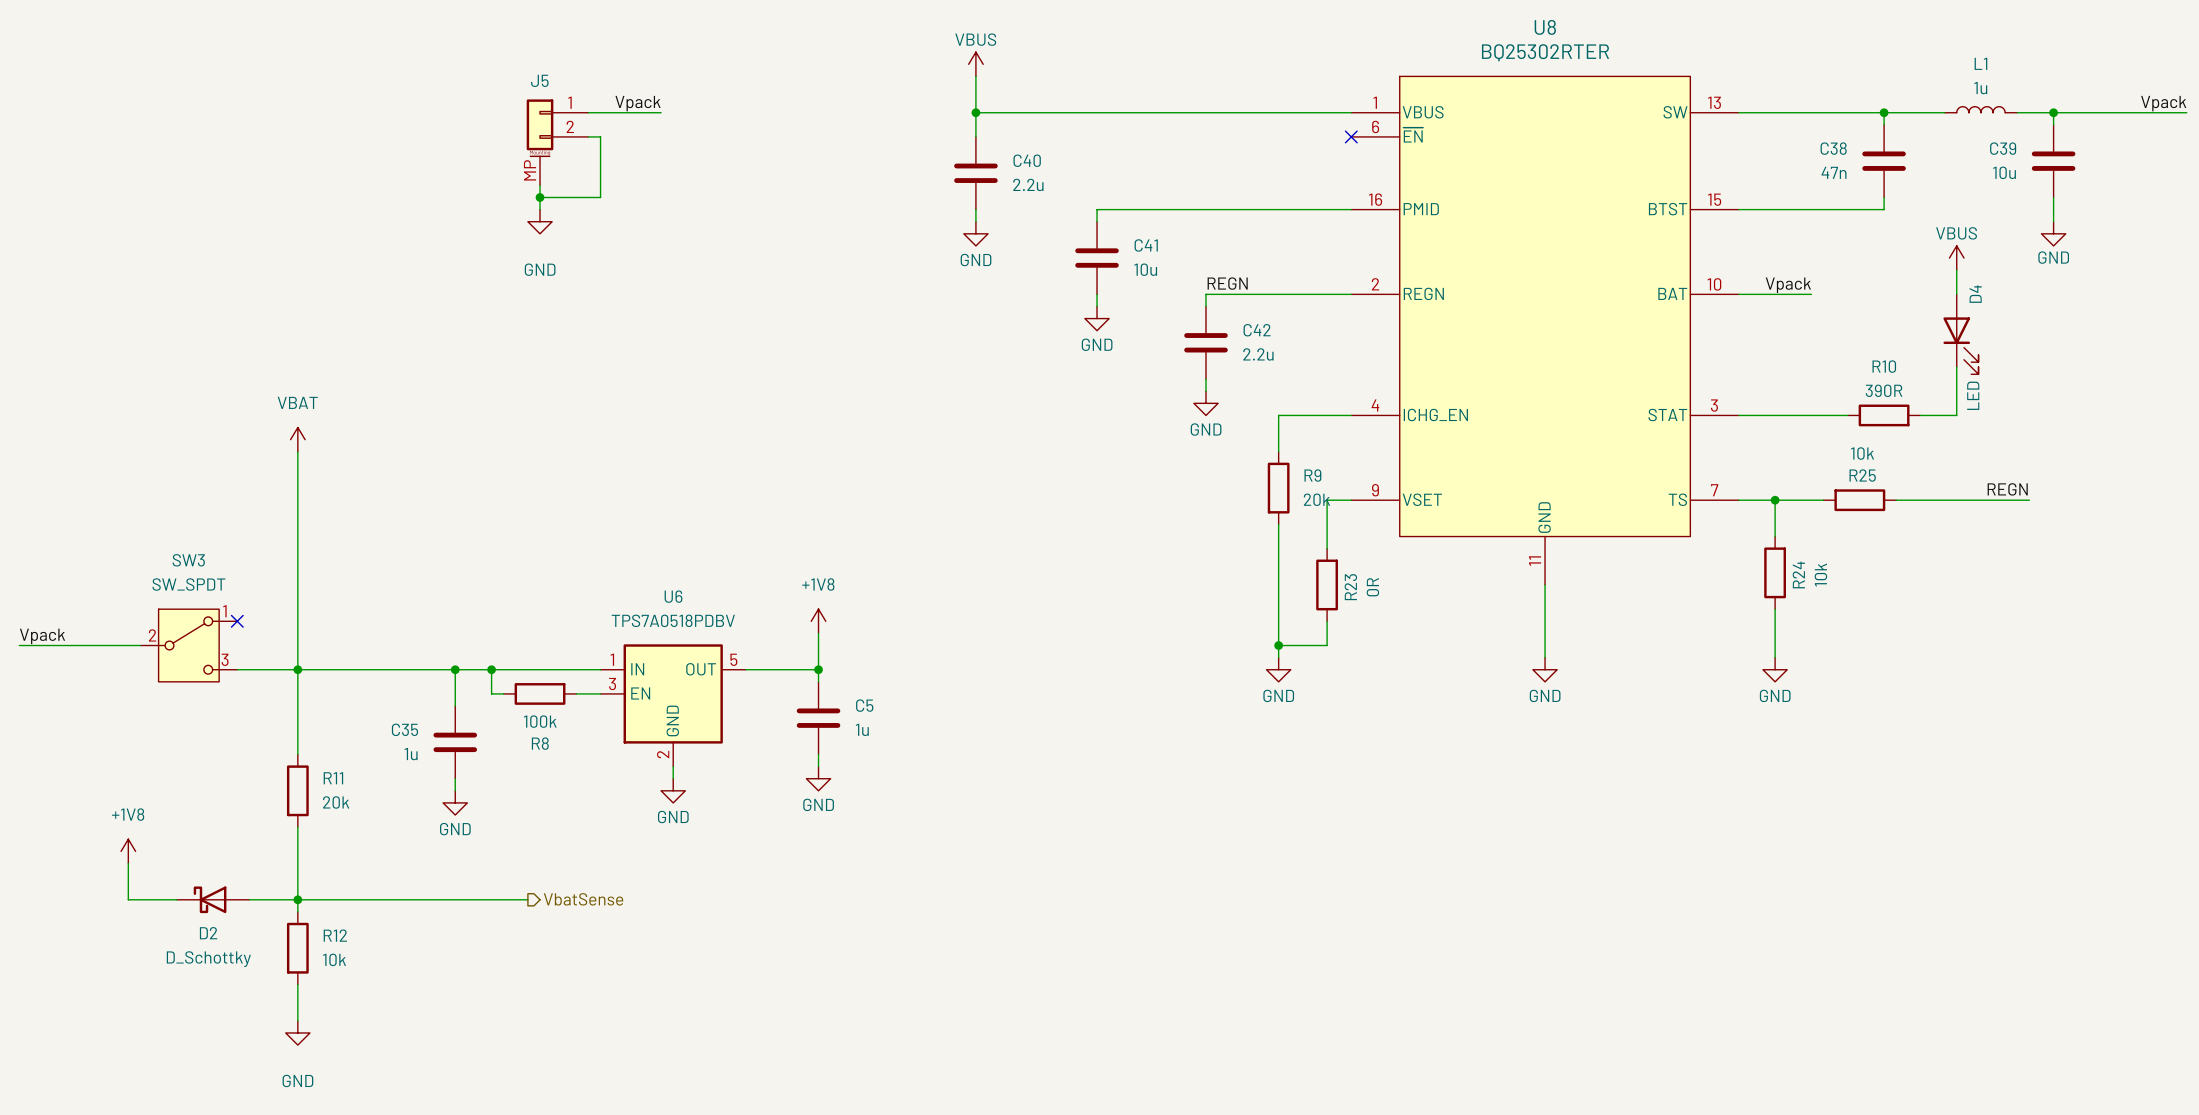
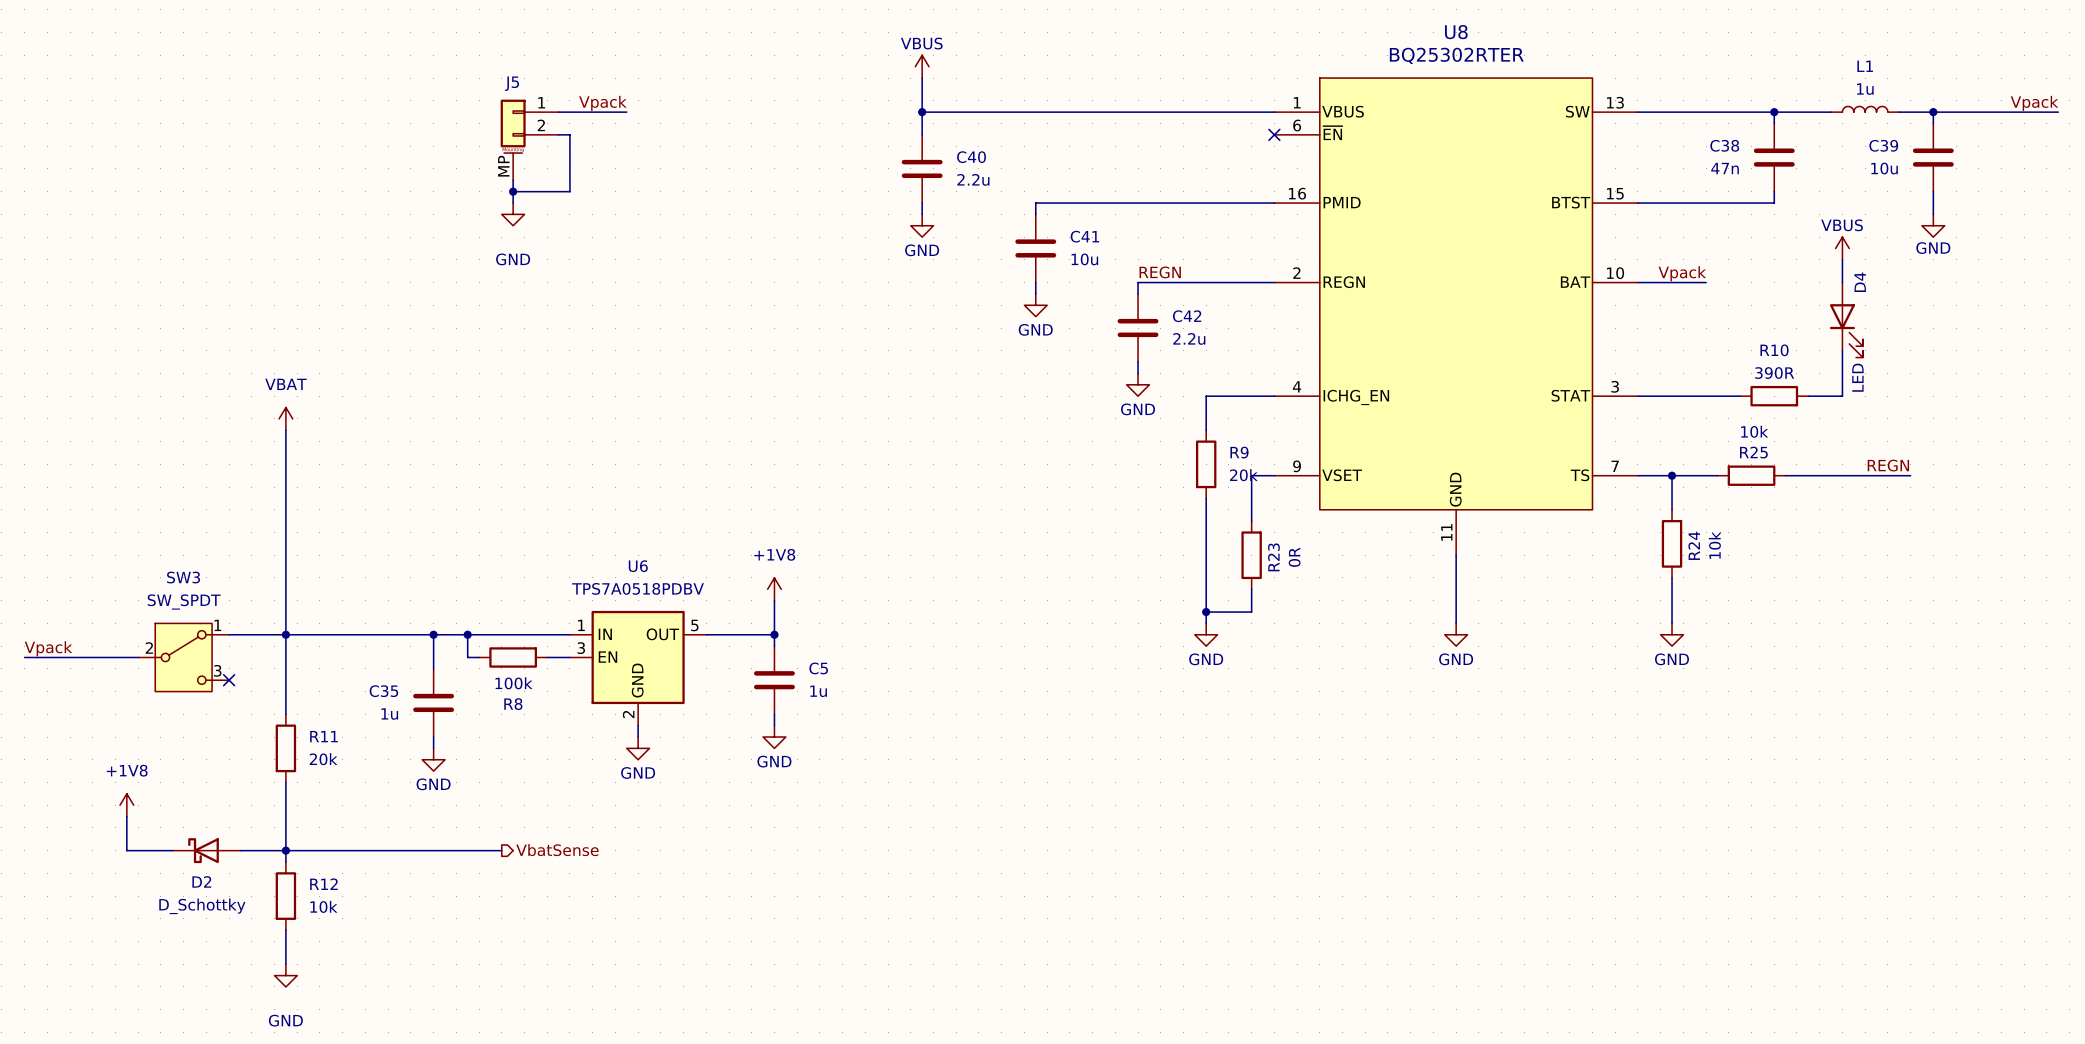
no-connect mark: (237, 621) -> none
label position: Vpack (42, 636) -> Vpack (48, 648)
wire: (19, 645) (140, 645) -> (24, 657) (138, 657)
SW3 position: (188, 645) -> (183, 657)
no-connect mark: none -> (229, 680)

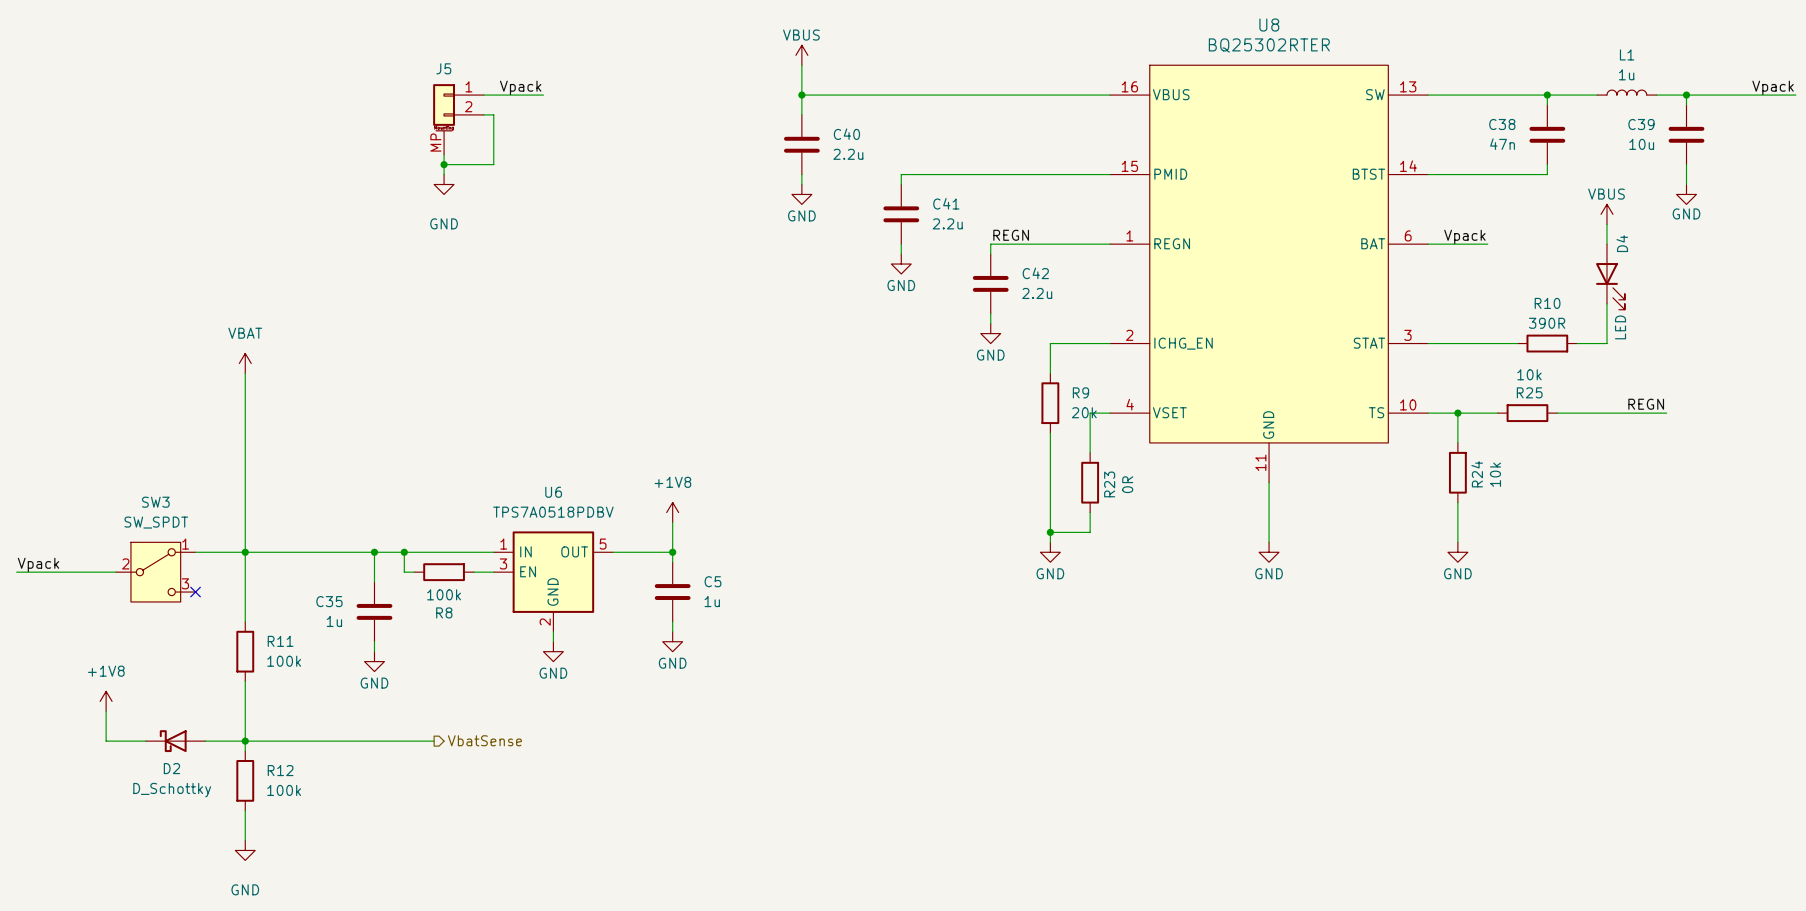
U8 symbol: [1274, 78, 1638, 556] -> [1110, 65, 1429, 483]
no-connect mark: (1274, 134) -> none
C41 value: 10u (1084, 259) -> 2.2u (947, 223)
R11 value: 20k (323, 759) -> 100k (284, 661)
R12 value: 10k (323, 906) -> 100k (284, 790)

